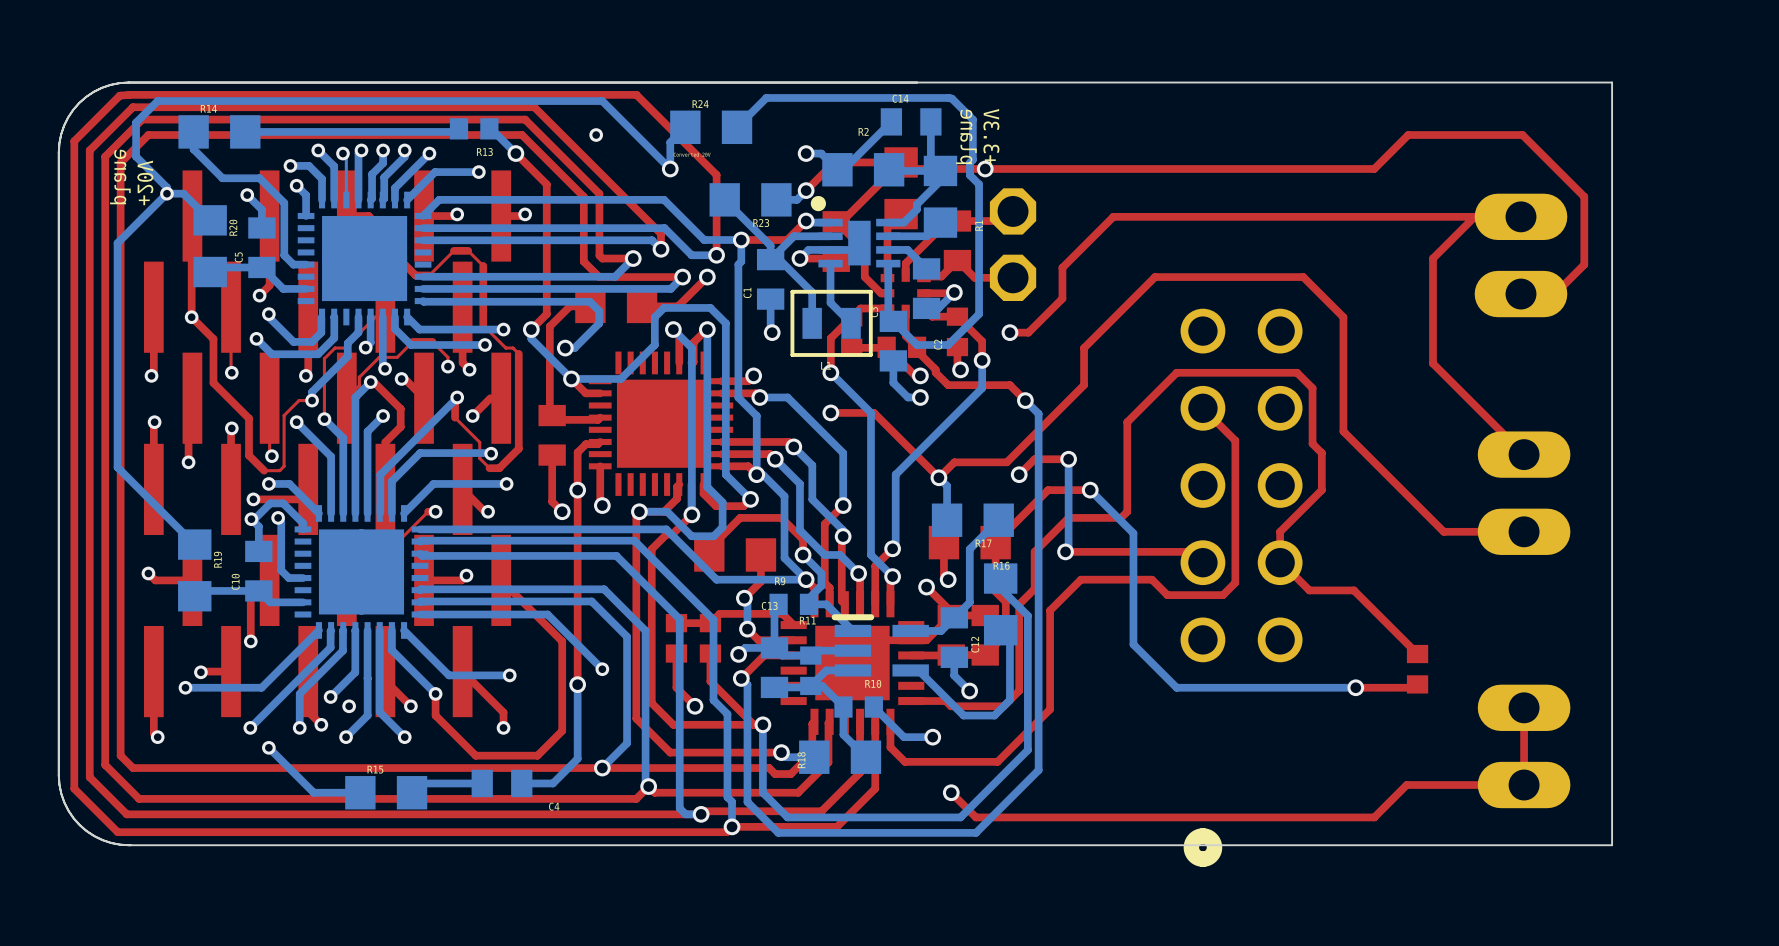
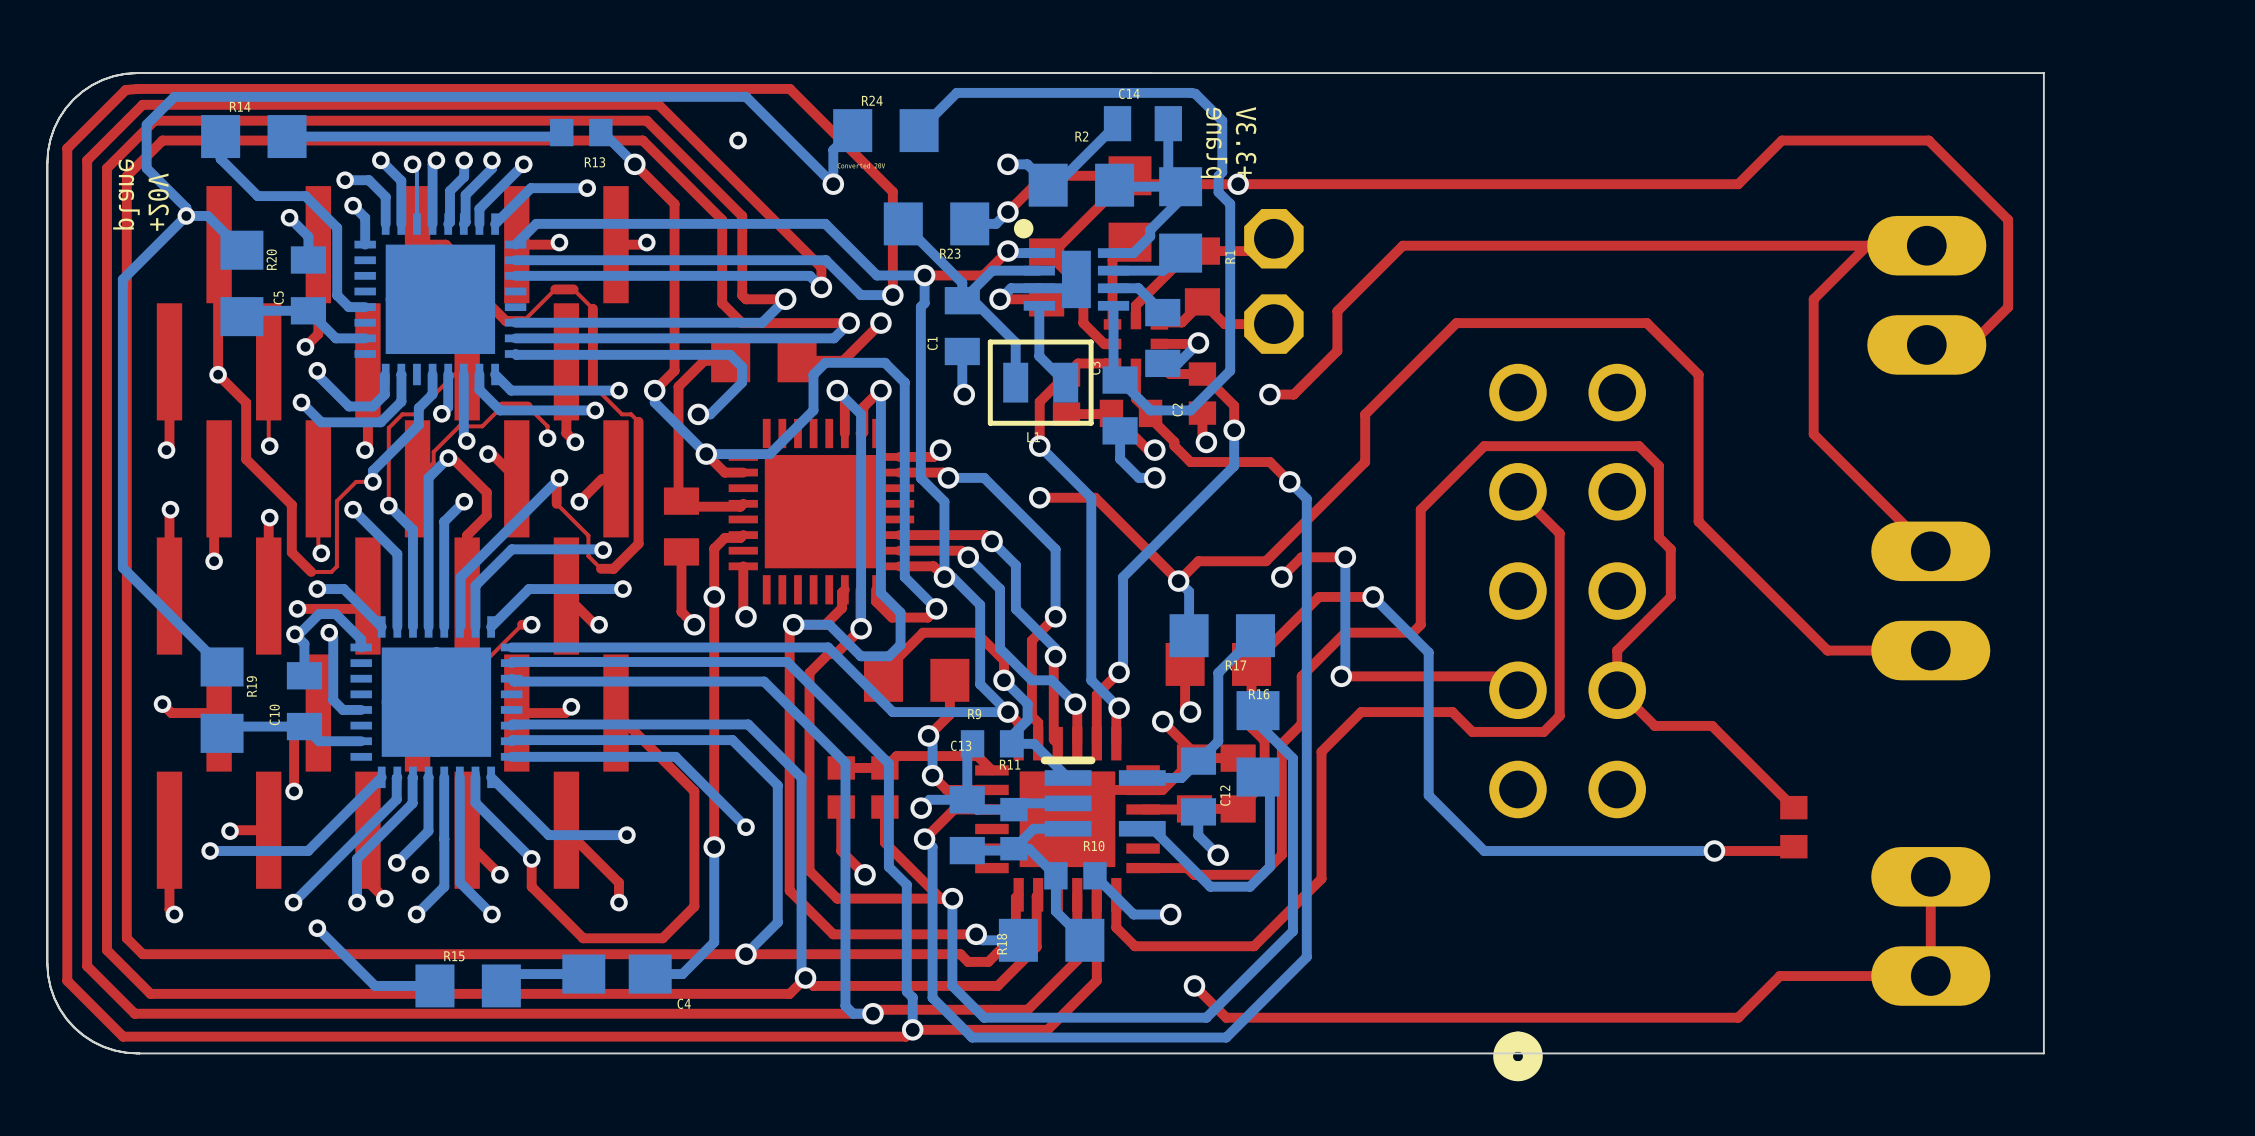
C4 footprint: [471, 769, 533, 798] -> [562, 954, 672, 994]

